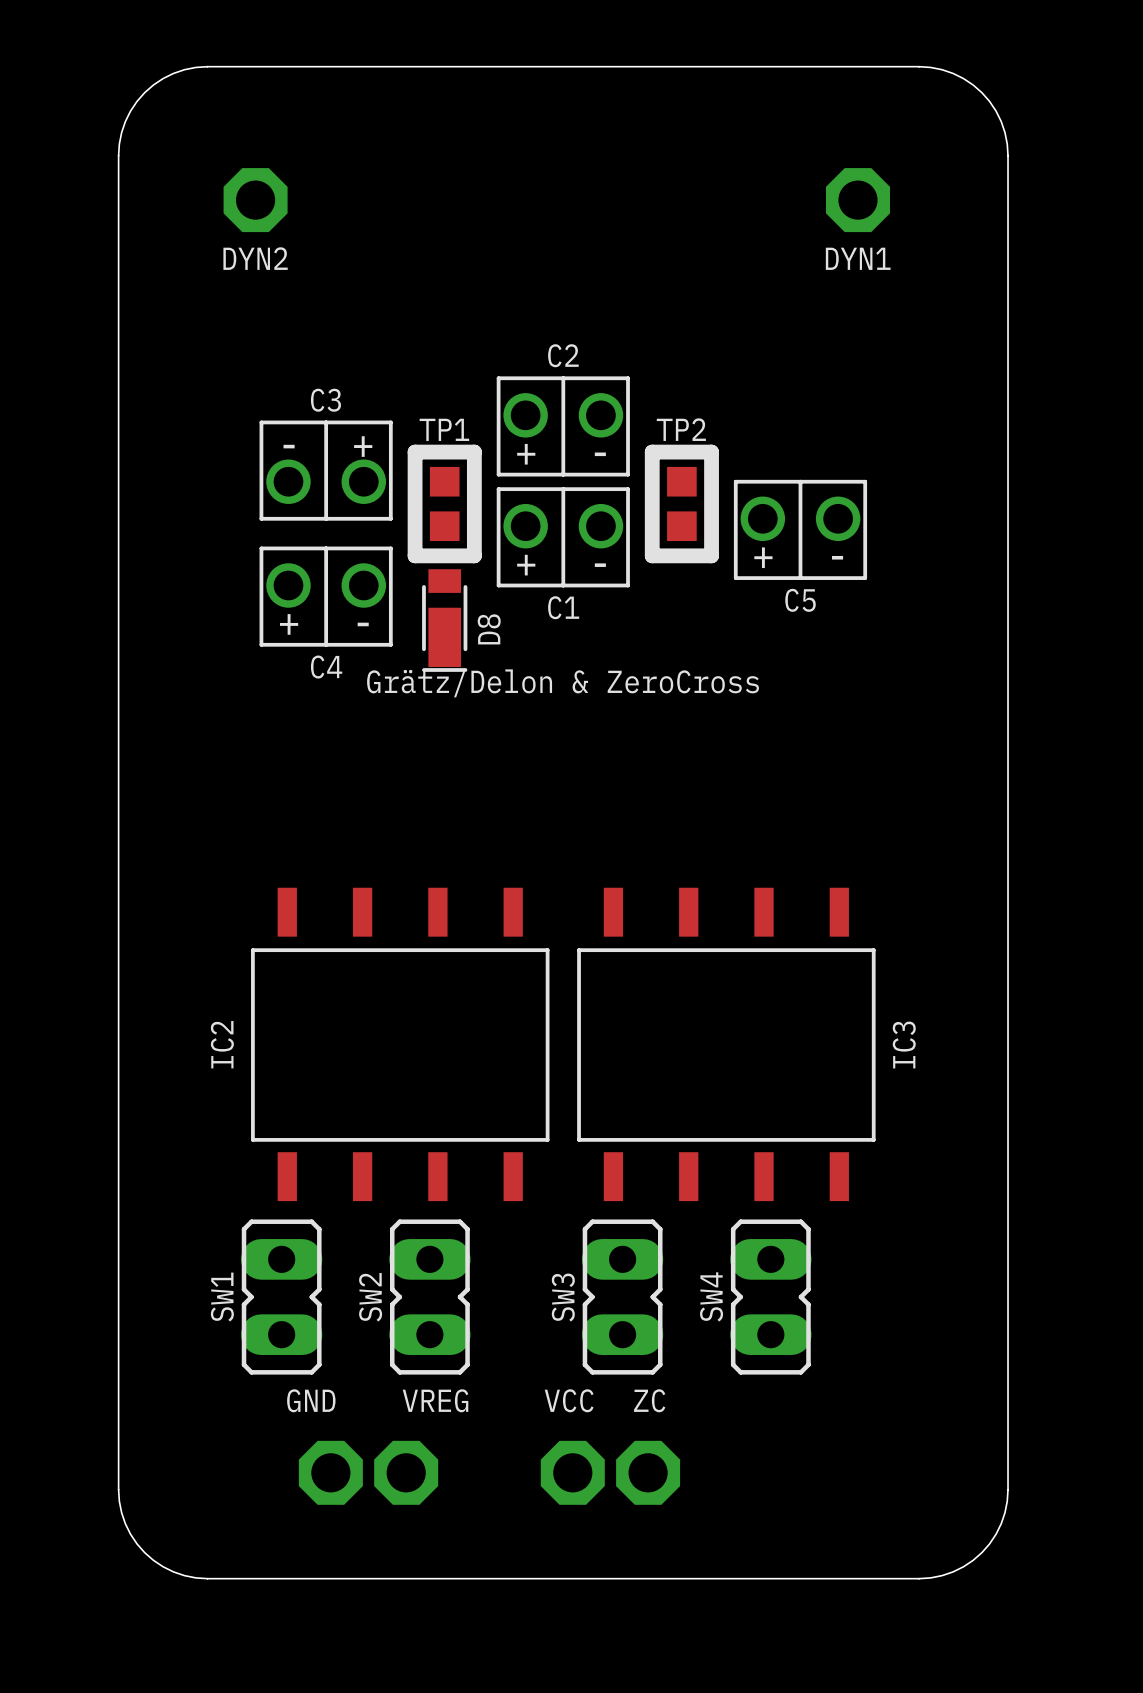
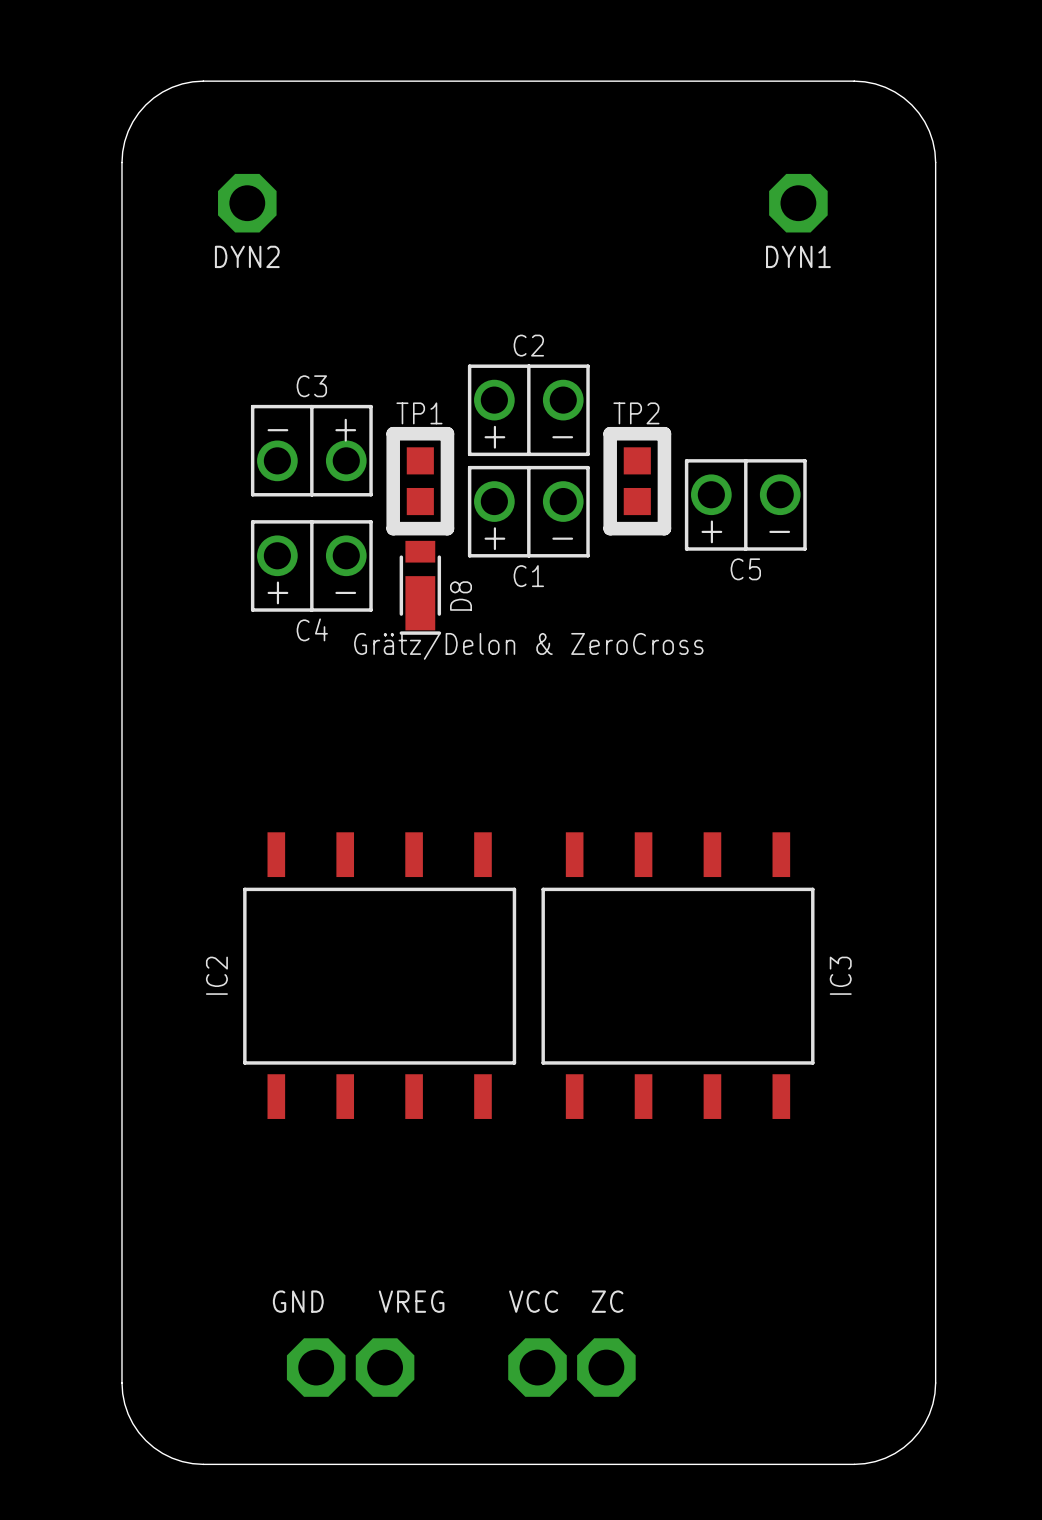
SW1: (281, 1297) -> none
SW2: (429, 1297) -> none
SW3: (622, 1297) -> none
SW4: (770, 1297) -> none

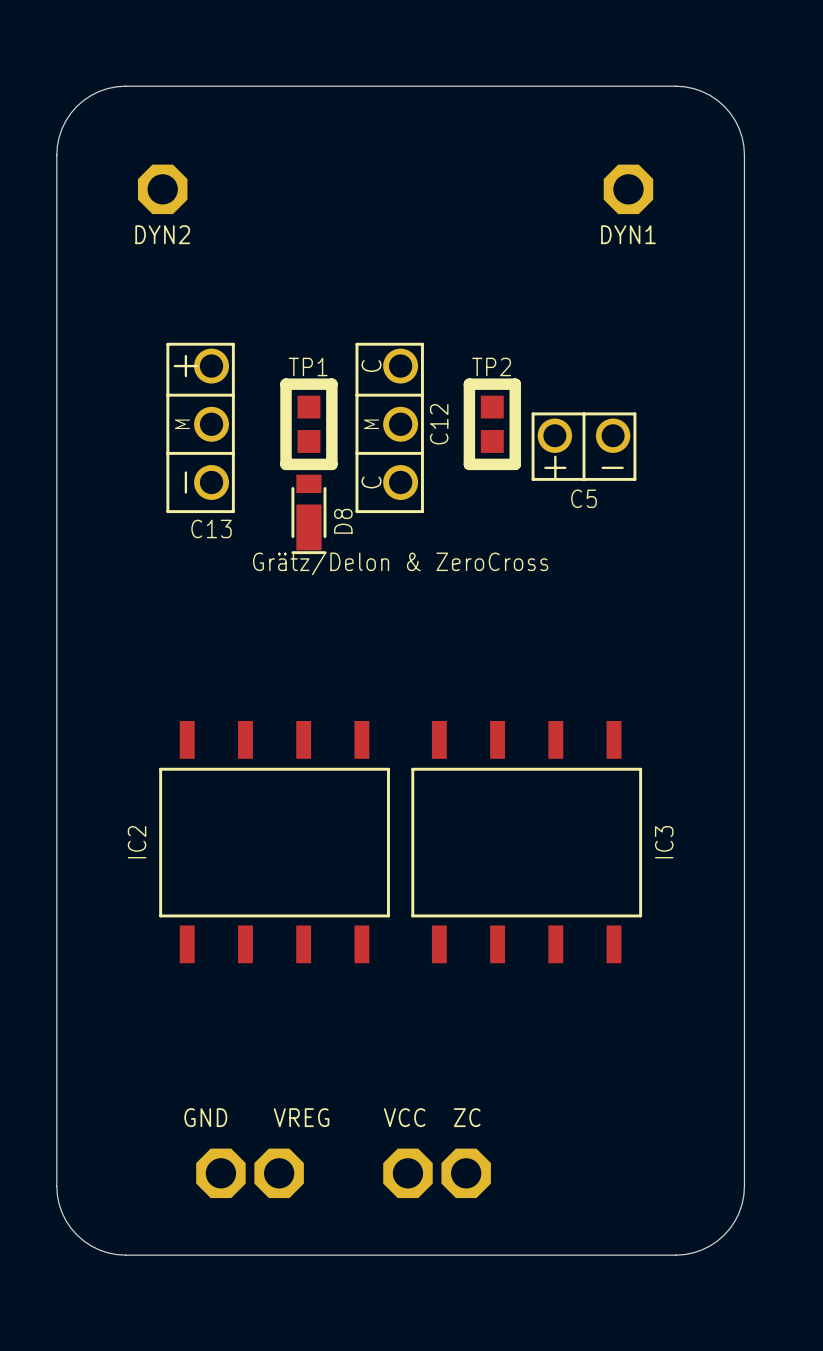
C2: (528, 410) -> none
C3: (311, 450) -> none
C5 footprint: [684, 459, 807, 551] -> [531, 412, 637, 481]
C13: none -> (200, 427)
C12: none -> (389, 427)
C1: (528, 511) -> none
C4: (311, 565) -> none

